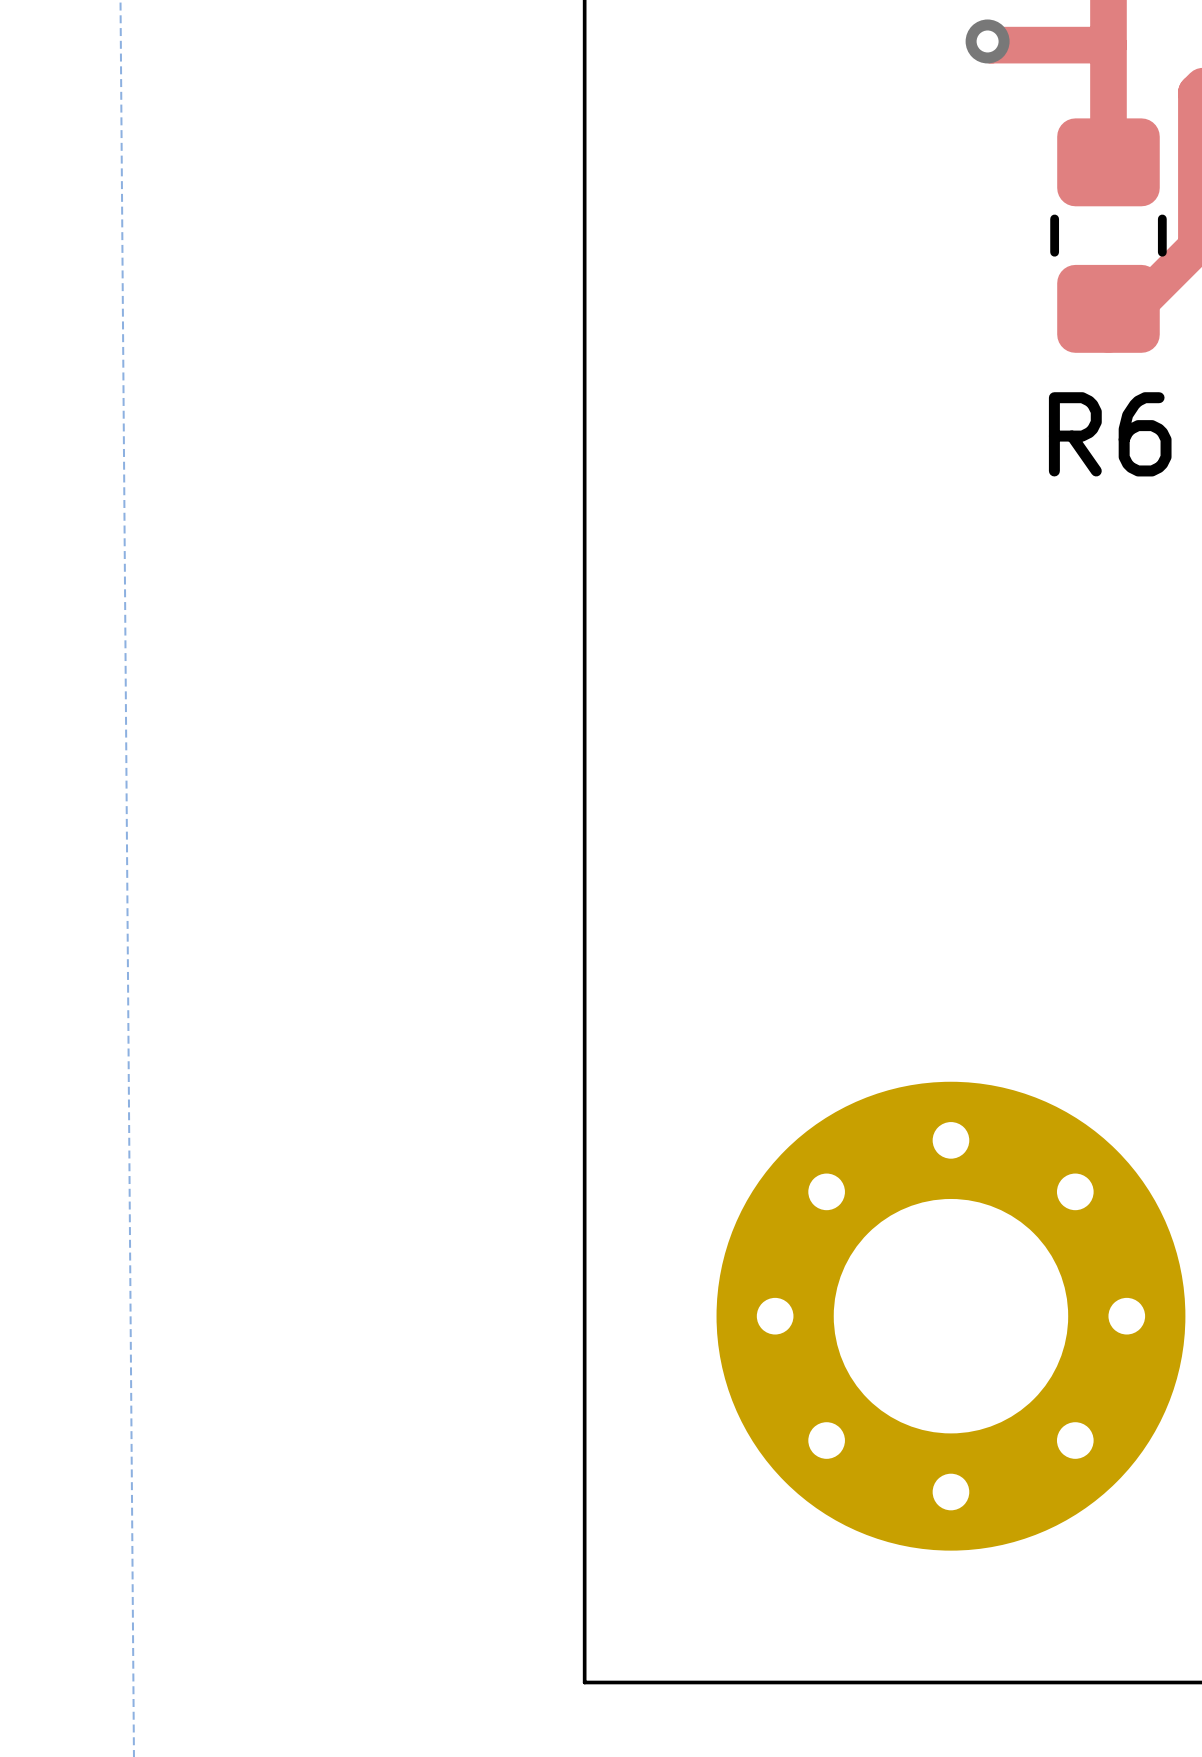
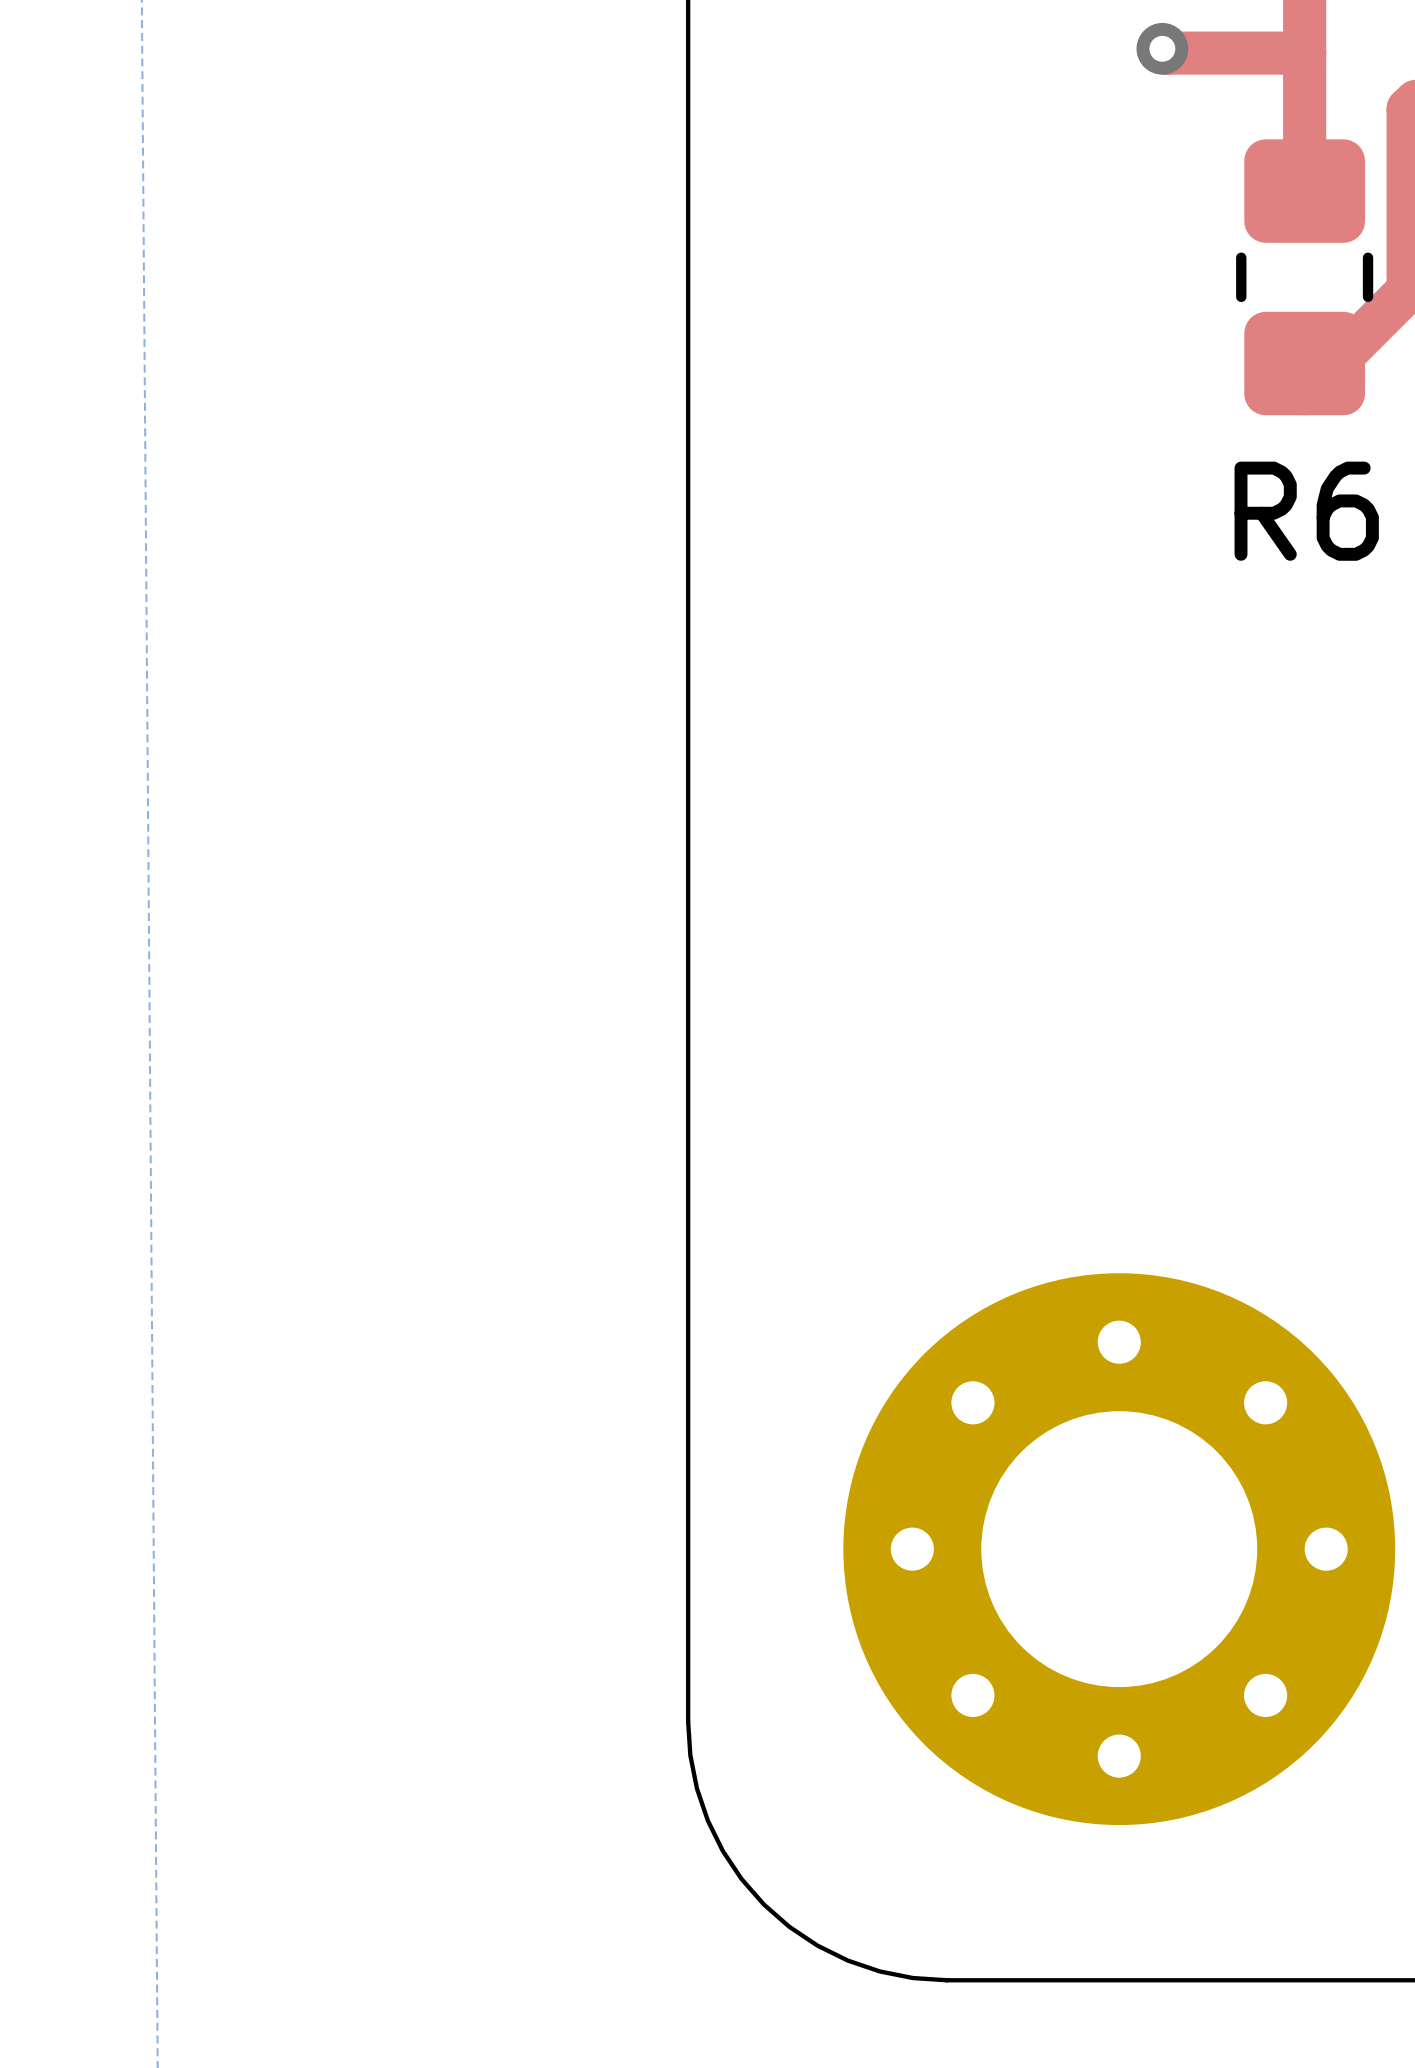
board edge: (584, 1462) (584, 1682) (804, 1682) -> (688, 1721) (690, 1755) (696, 1788) (707, 1820) (722, 1850) (741, 1879) (763, 1904) (789, 1926) (817, 1945) (847, 1960) (879, 1971) (913, 1978) (946, 1980)

